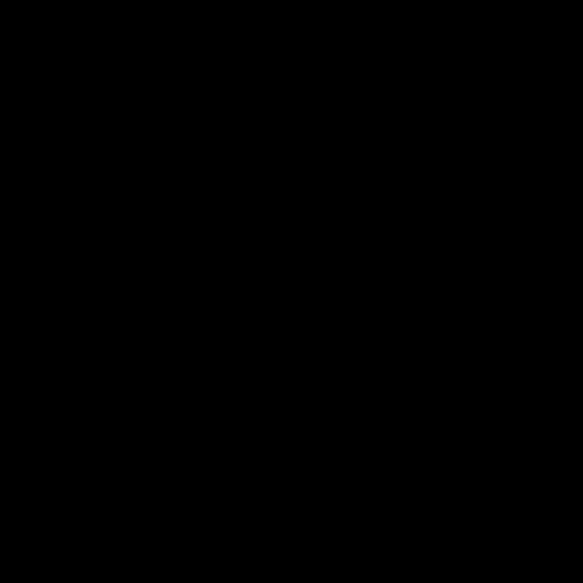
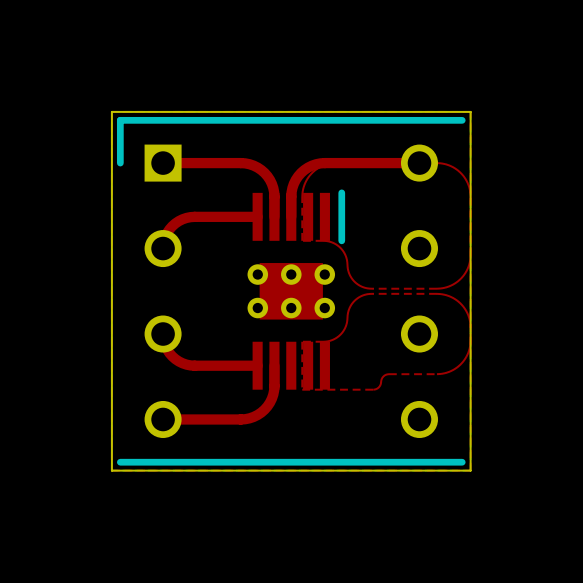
board edge: none -> (111, 111) (470, 111) (470, 470) (111, 470) (111, 111)
top track: none -> (163, 163) (240, 163) (253, 165) (264, 172) (271, 183) (274, 192) (274, 216)
top track: none -> (419, 163) (324, 163) (312, 165) (301, 172) (293, 183) (291, 192) (291, 216)
top zone outline: none -> (470, 196) (468, 183) (460, 172) (449, 165) (436, 163) (327, 164) (319, 167) (309, 176) (304, 183) (302, 196) (302, 240) (326, 241) (338, 245) (345, 255) (350, 276) (362, 286) (371, 288) (445, 287) (457, 281) (463, 275) (469, 263) (470, 255)
top track: none -> (257, 216) (186, 217) (175, 223) (169, 229) (164, 240) (163, 248)
part: none -> (296, 289)
part: none -> (291, 291)
top zone outline: none -> (470, 327) (469, 318) (463, 307) (457, 300) (445, 294) (371, 293) (362, 295) (350, 305) (345, 326) (338, 336) (326, 341) (302, 341) (302, 389) (374, 389) (379, 386) (382, 378) (386, 374) (445, 373) (457, 367) (463, 361) (469, 349) (470, 340)
top track: none -> (163, 334) (164, 342) (169, 353) (178, 361) (186, 364) (257, 365)
top track: none -> (274, 365) (274, 390) (271, 398) (264, 409) (253, 416) (240, 419) (163, 419)

